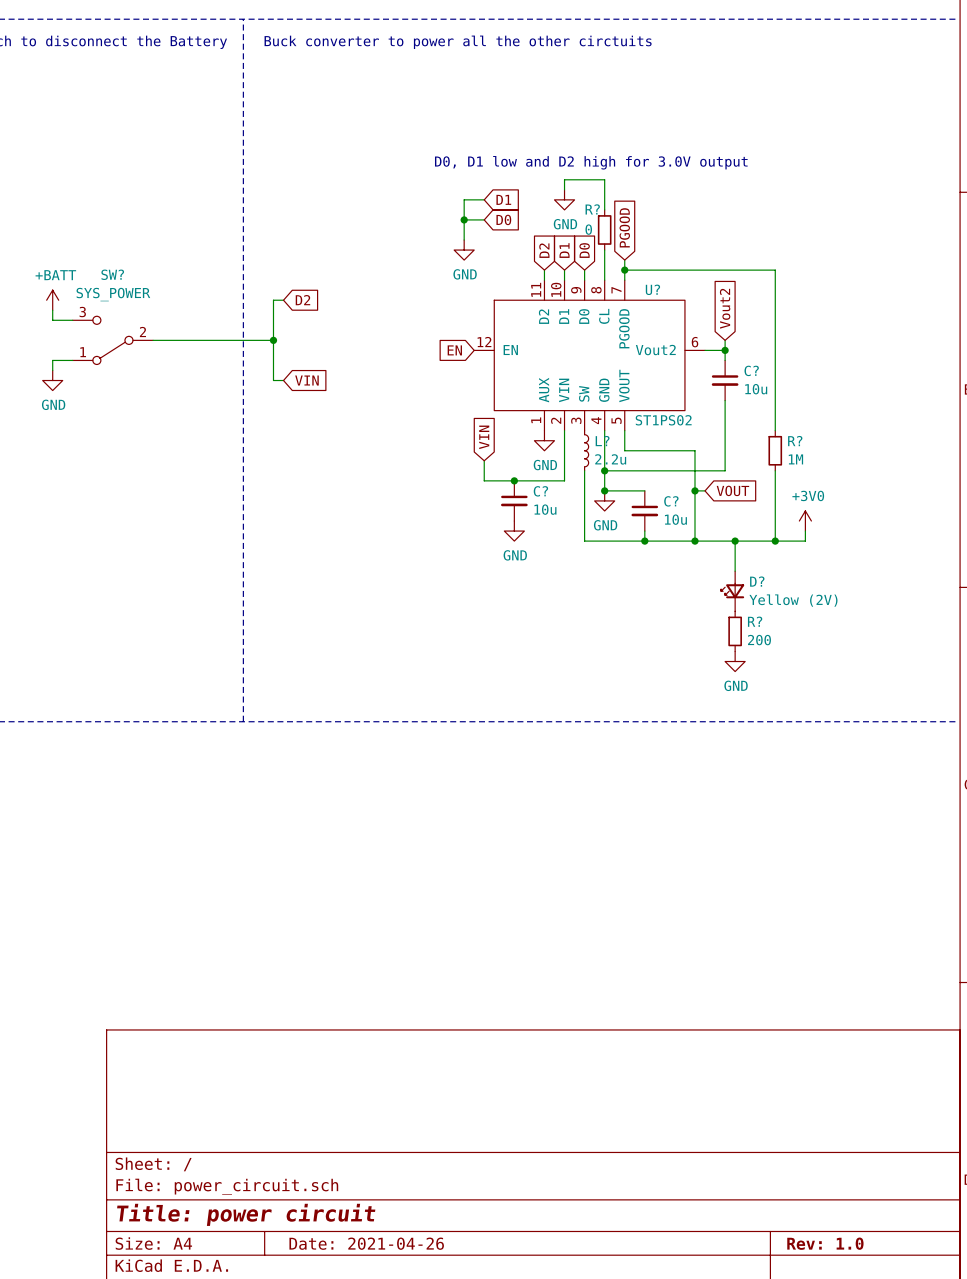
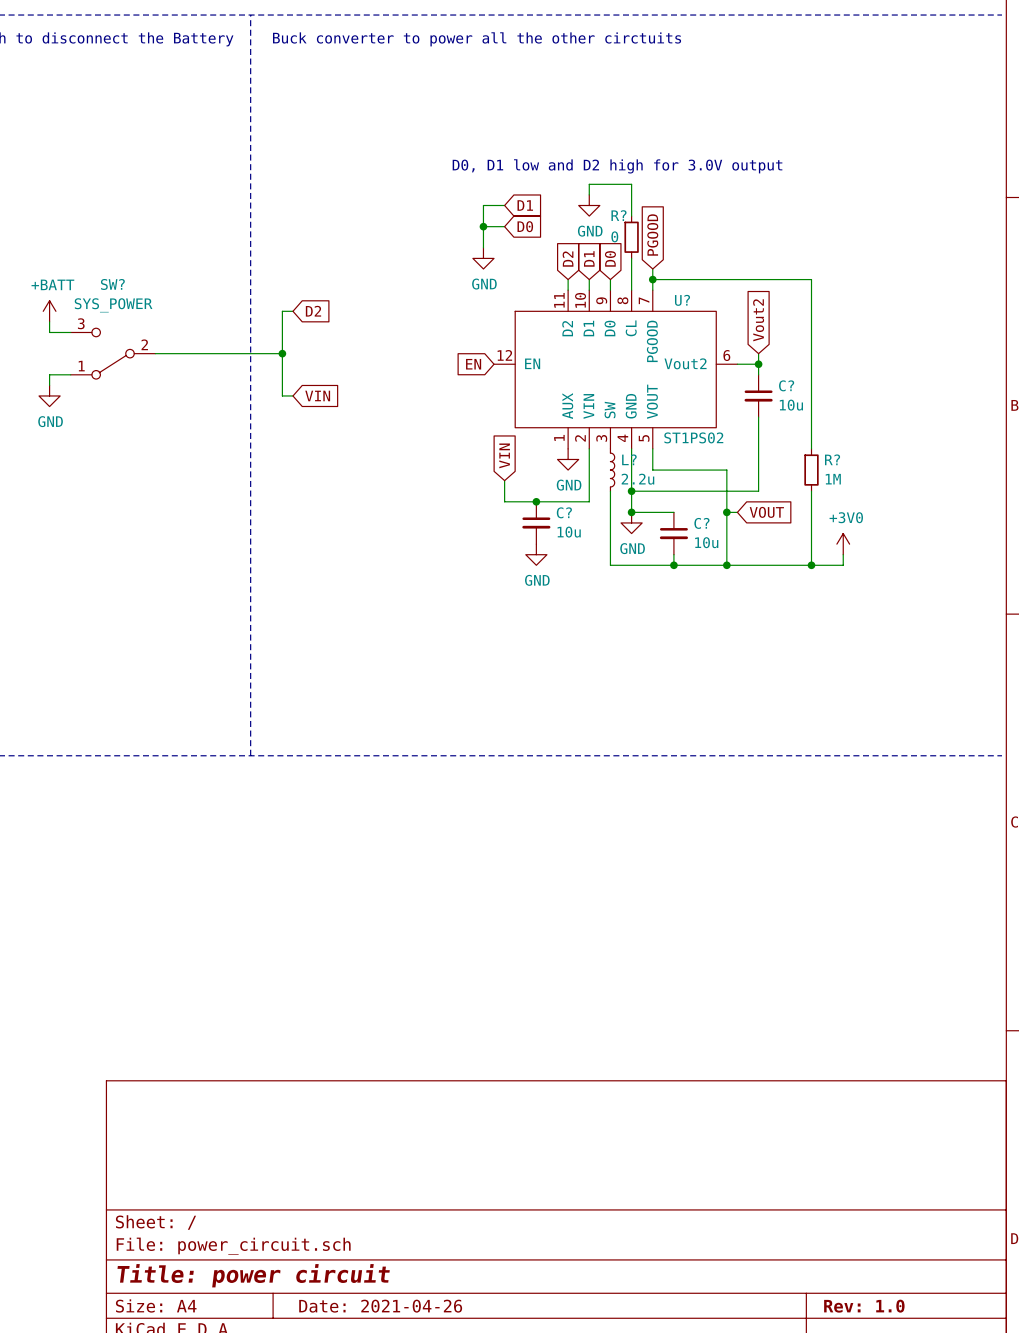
wire: (735, 541) (735, 571) -> none
junction: (735, 541) -> none
D?: Yellow (2V) (732, 591) -> none
R?: 200 (735, 631) -> none
power symbol: GND (735, 661) -> none

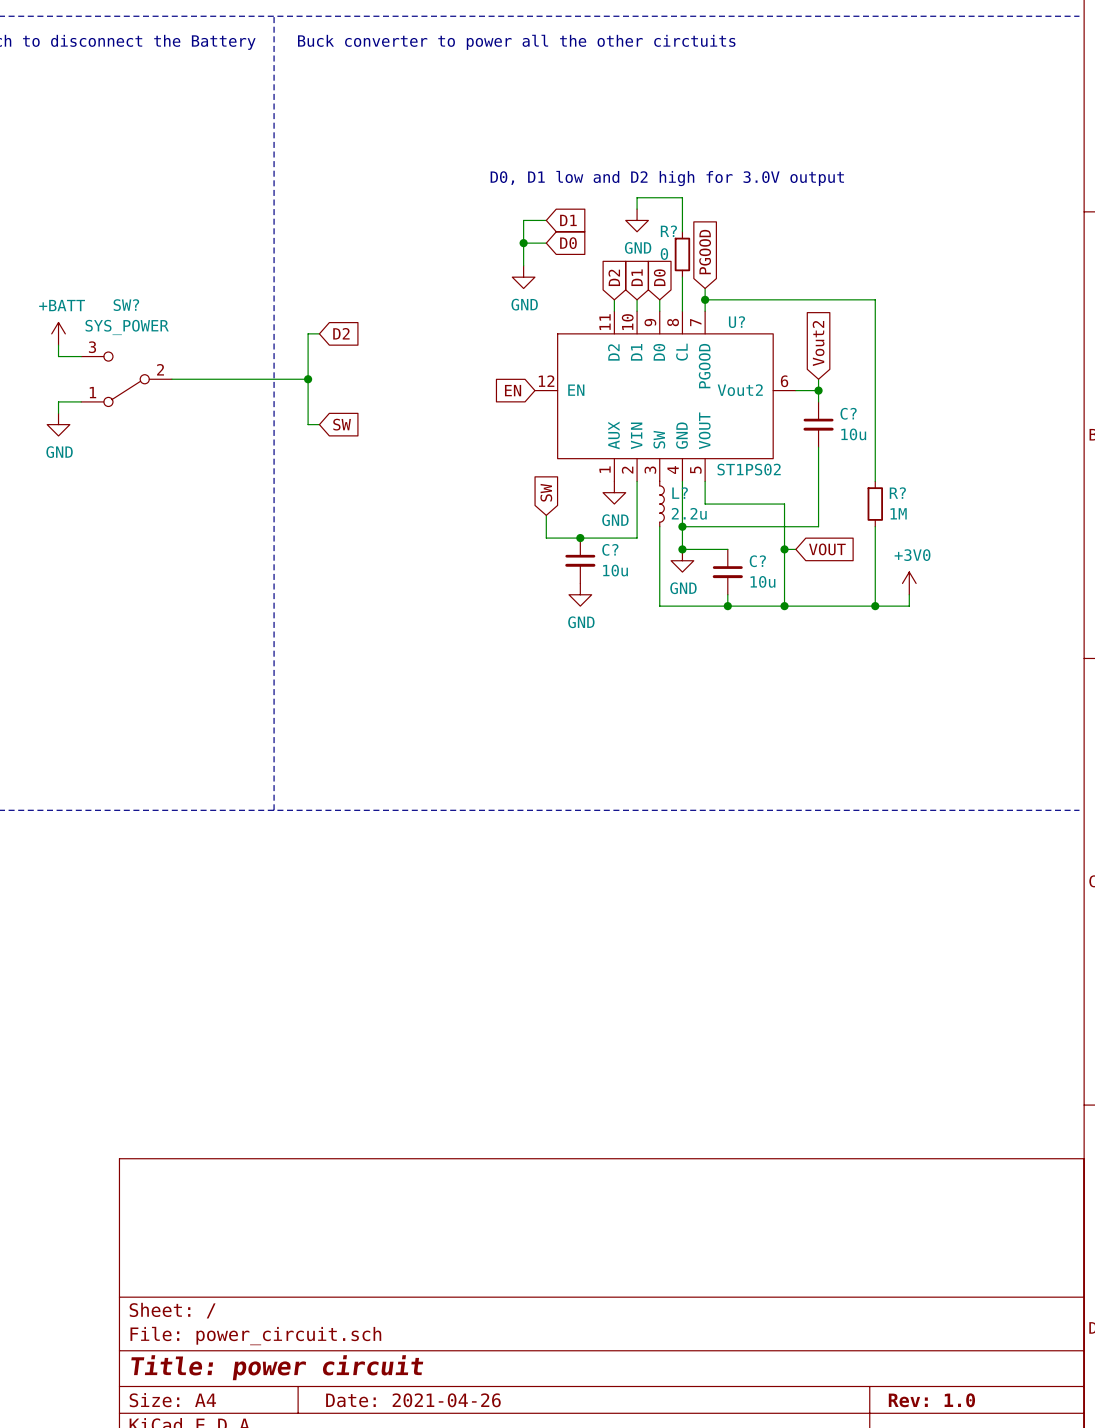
global label: VIN (317, 395) -> SW (342, 424)
global label: VIN (504, 455) -> SW (546, 492)

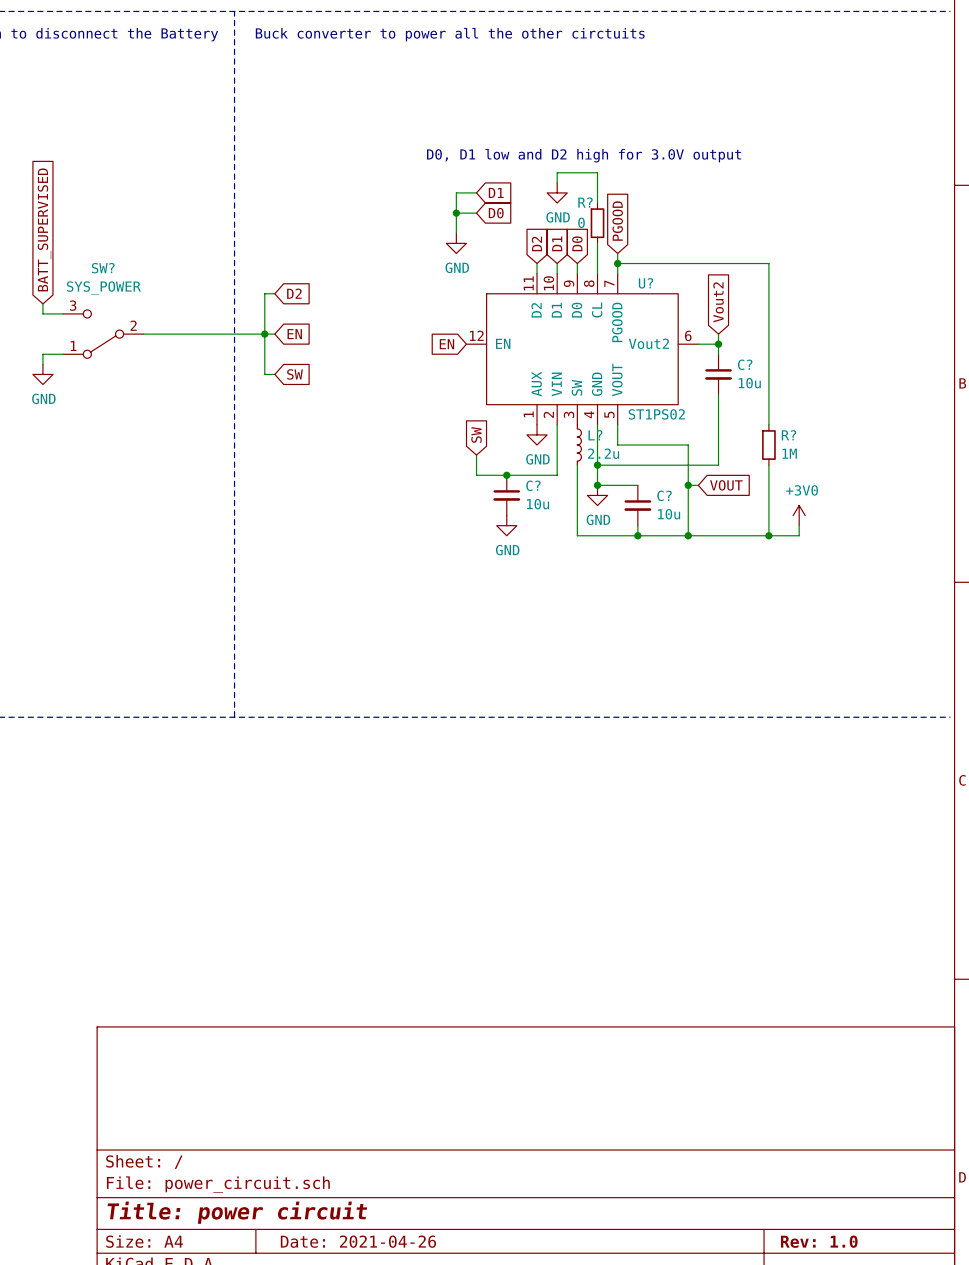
global label: none -> BATT_SUPERVISED (44, 229)
power symbol: +BATT (58, 333) -> none
wire: none -> (264, 334) (274, 334)
global label: none -> EN (294, 334)

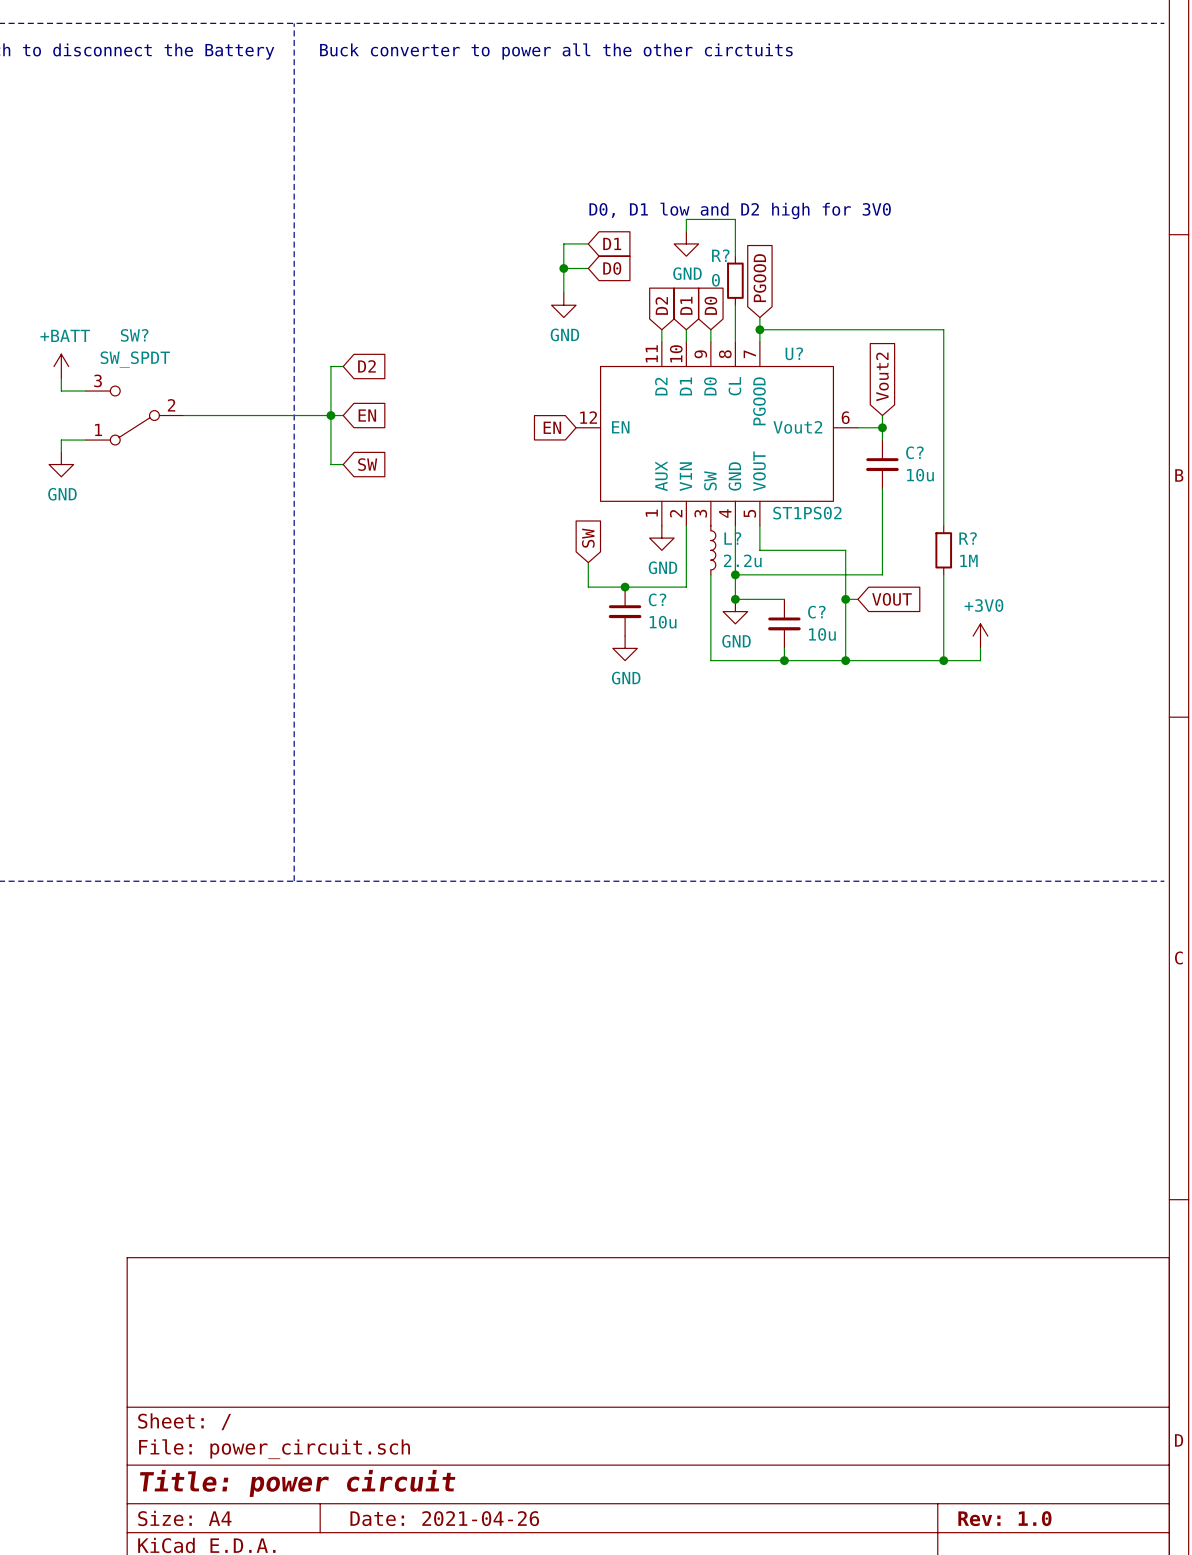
text: D0, D1 low and D2 high for 3.0V output (584, 155) -> D0, D1 low and D2 high for 3V0 (740, 210)
global label: BATT_SUPERVISED (44, 229) -> none
SW? value: SYS_POWER (103, 288) -> SW_SPDT (135, 359)
power symbol: none -> +BATT (61, 366)

